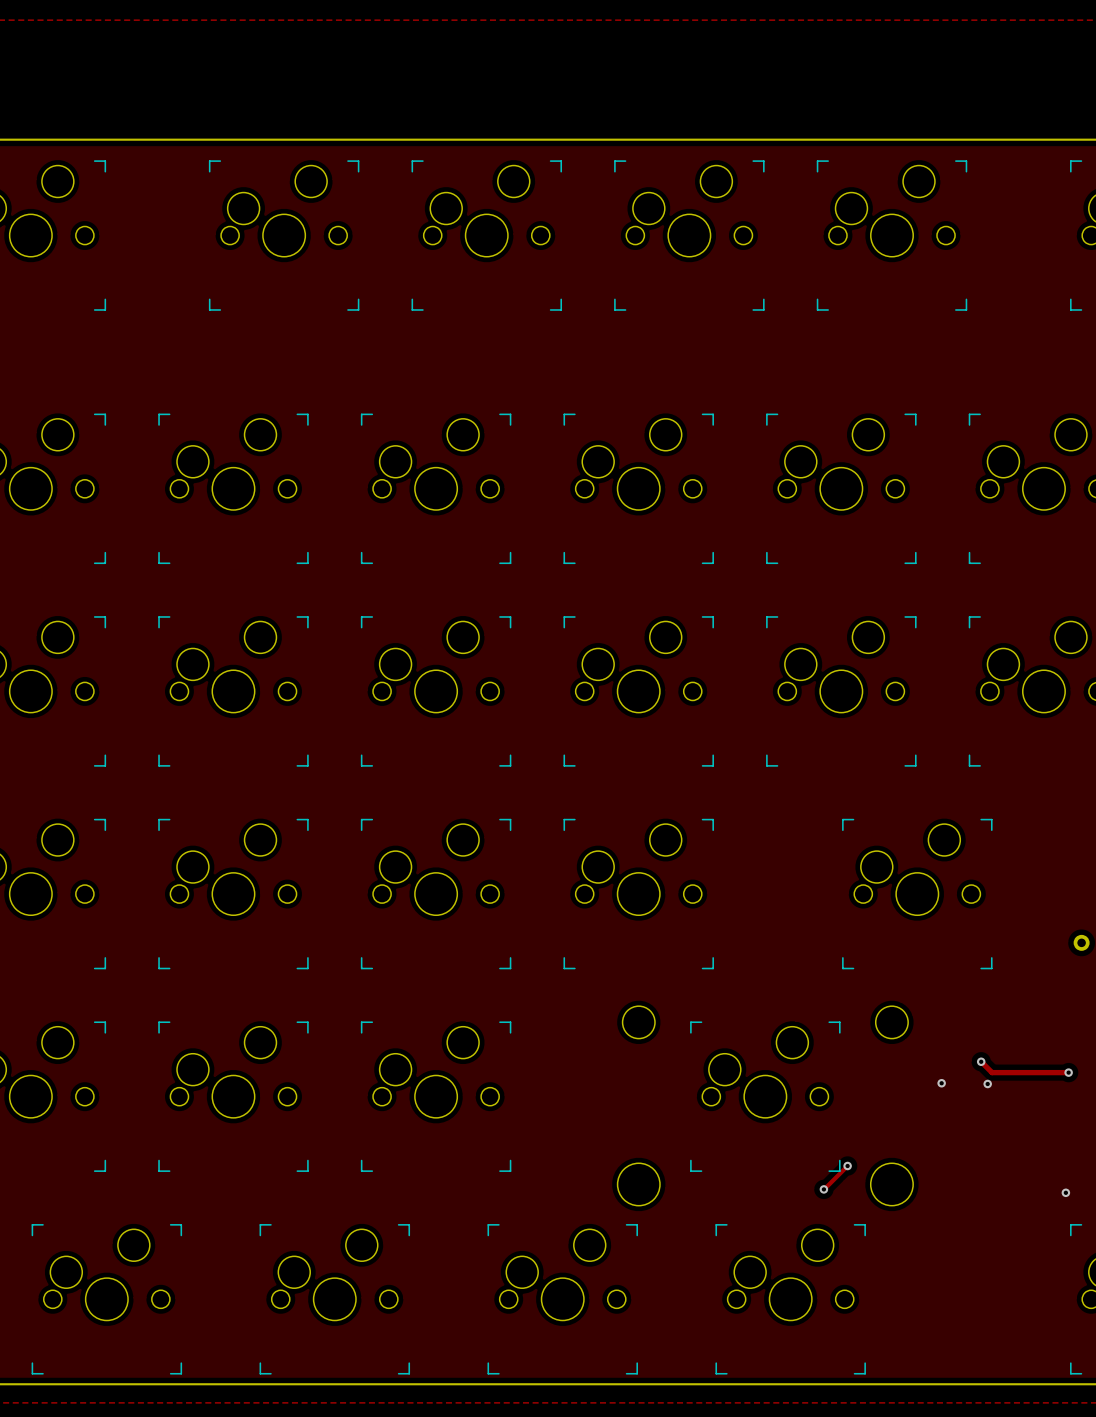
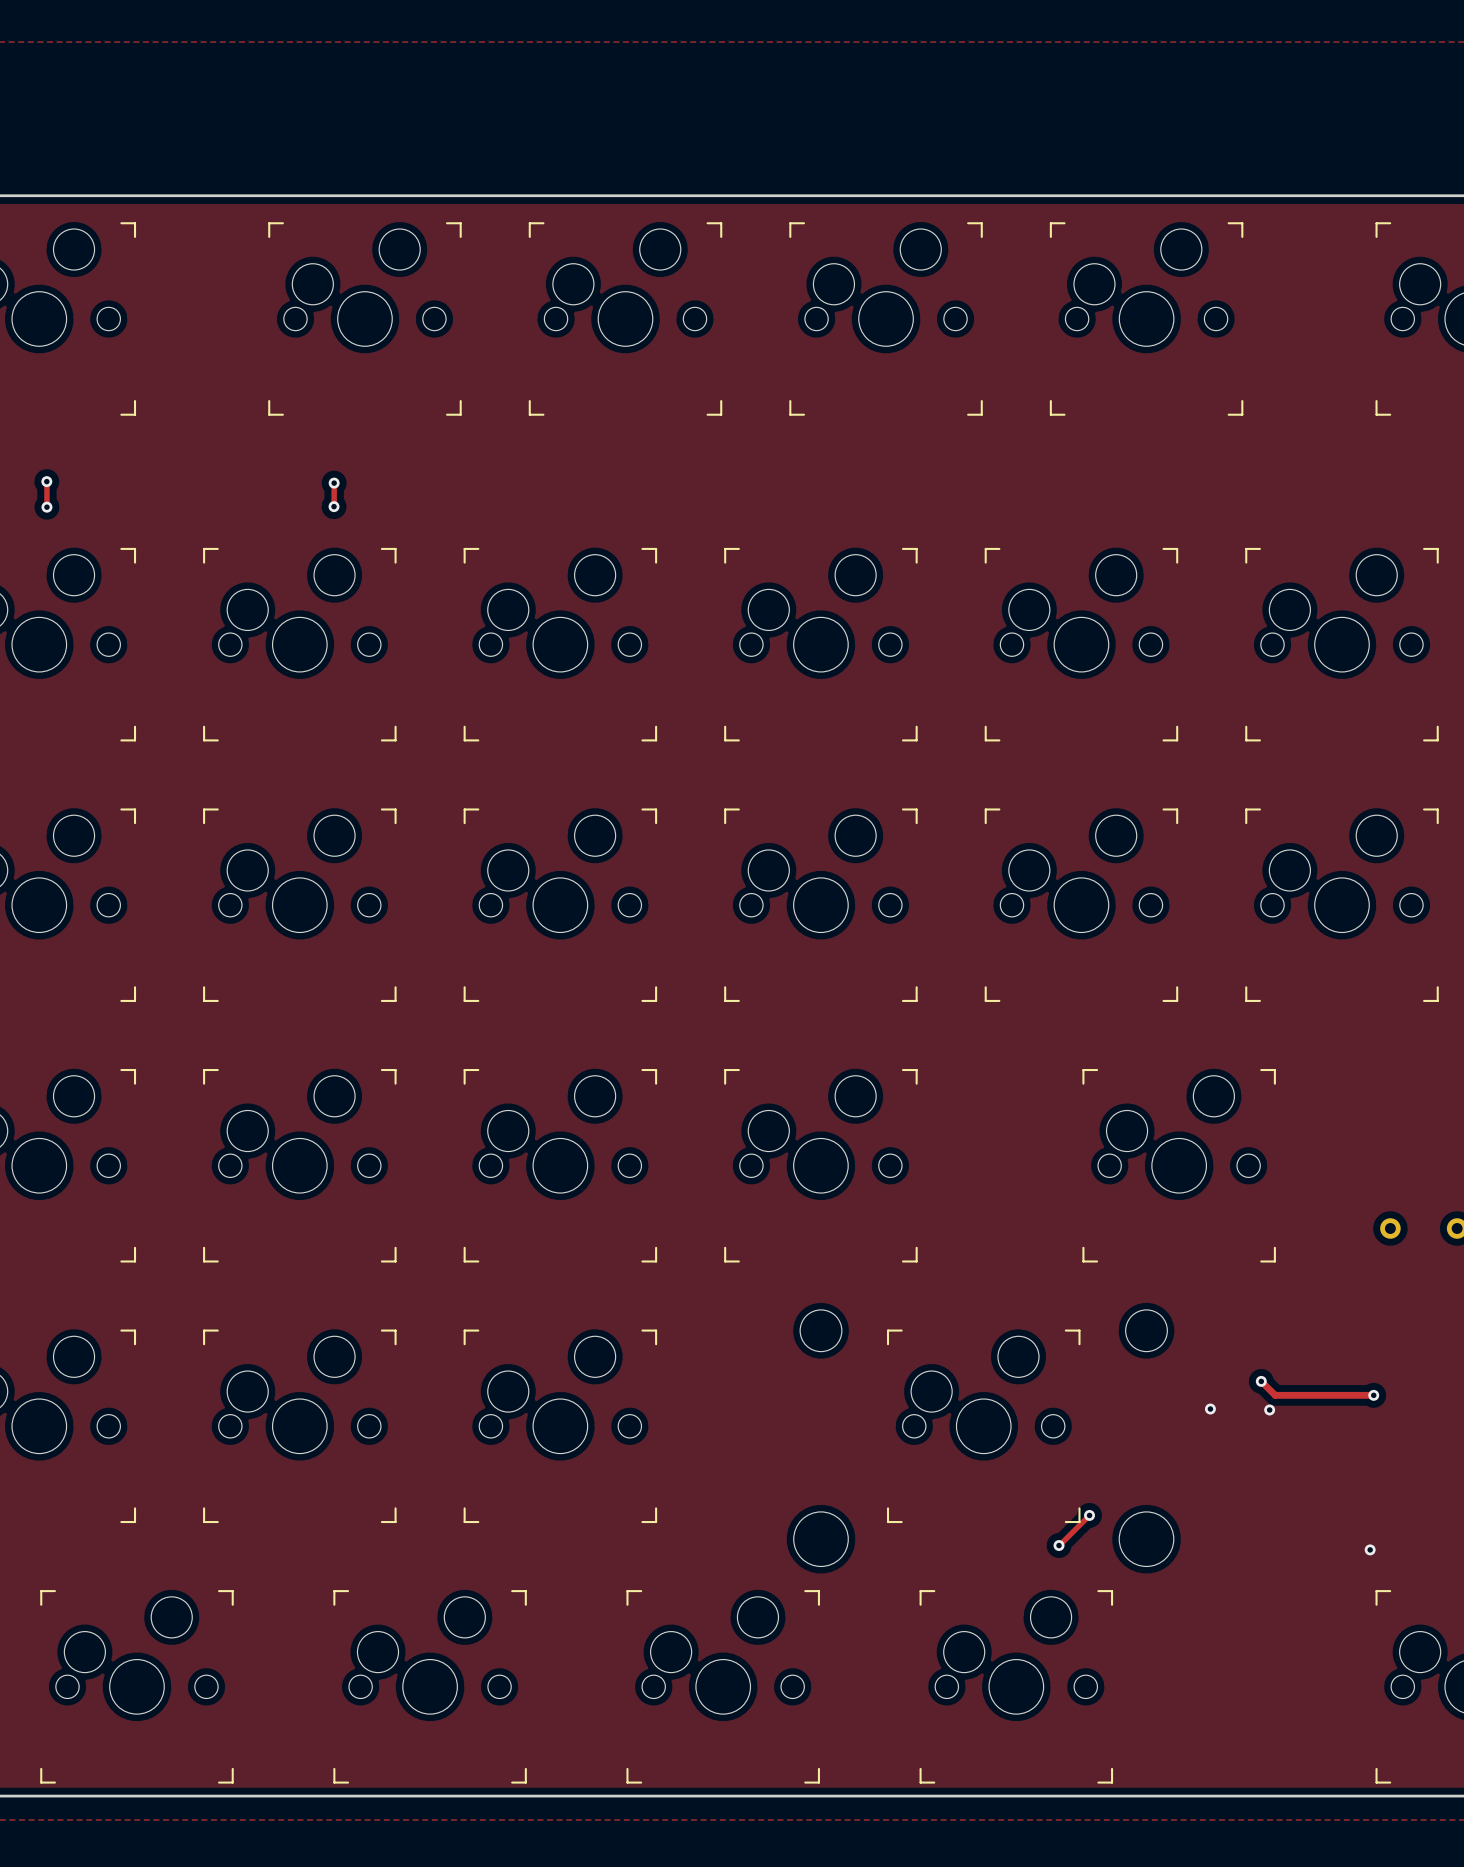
track: none -> (46, 481) (46, 507)
via: none -> (46, 481)
track: none -> (334, 483) (334, 506)
via: none -> (334, 483)
via: none -> (46, 507)
via: none -> (334, 506)

